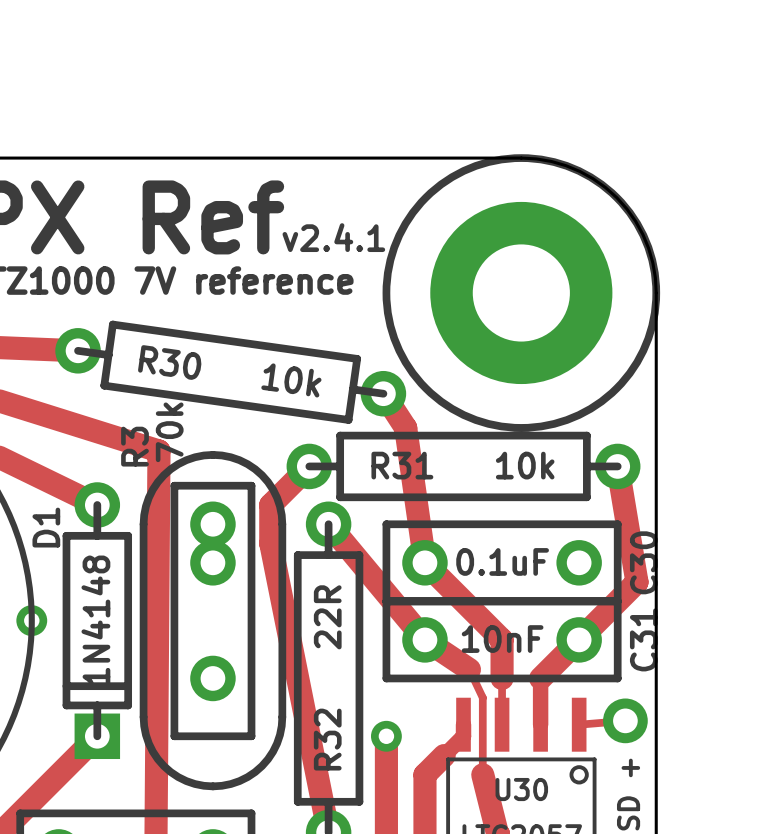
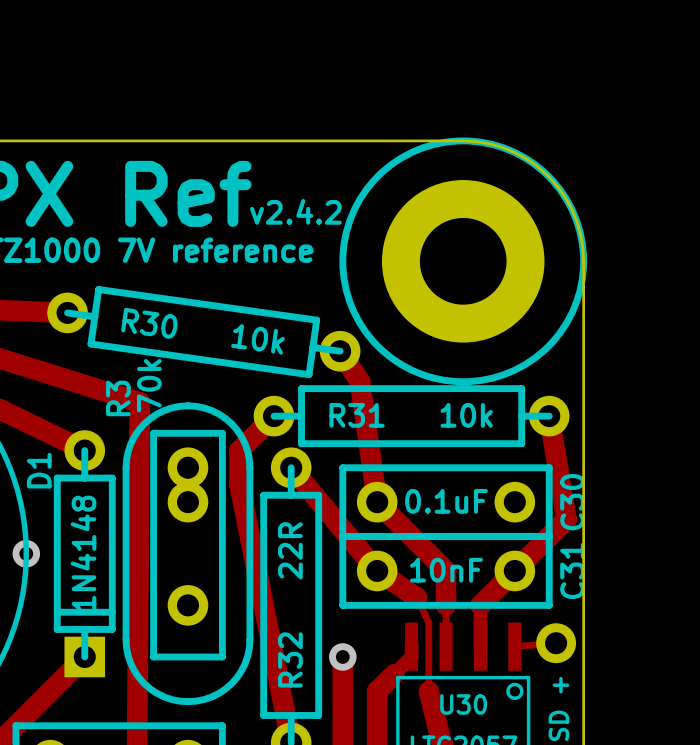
text: v2.4.1 (333, 237) -> v2.4.2 (295, 211)

